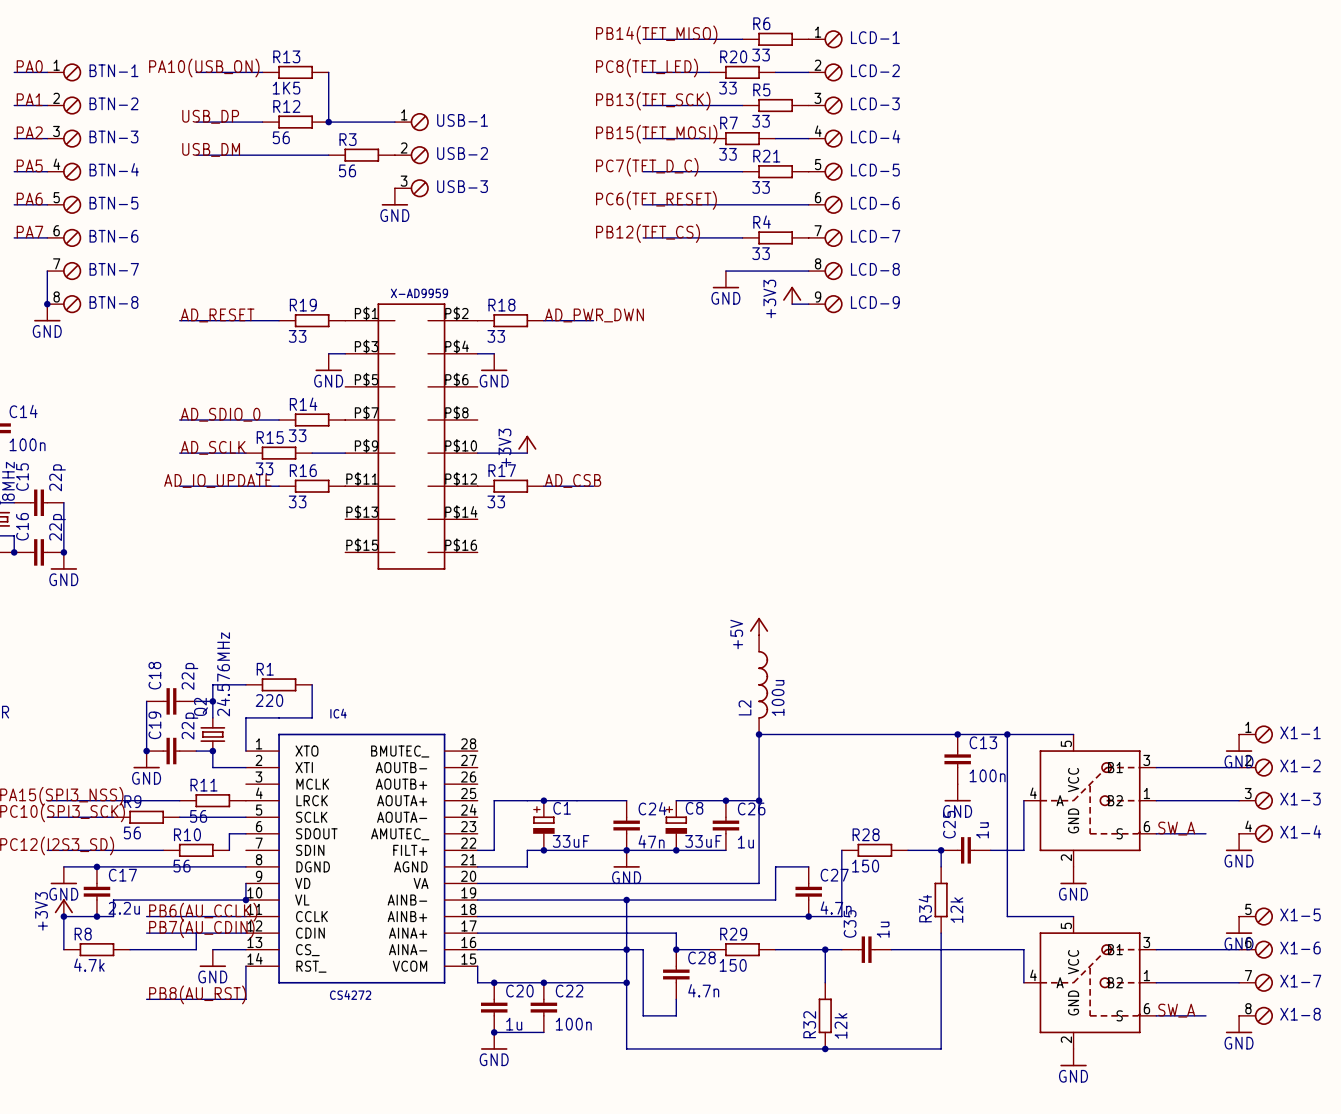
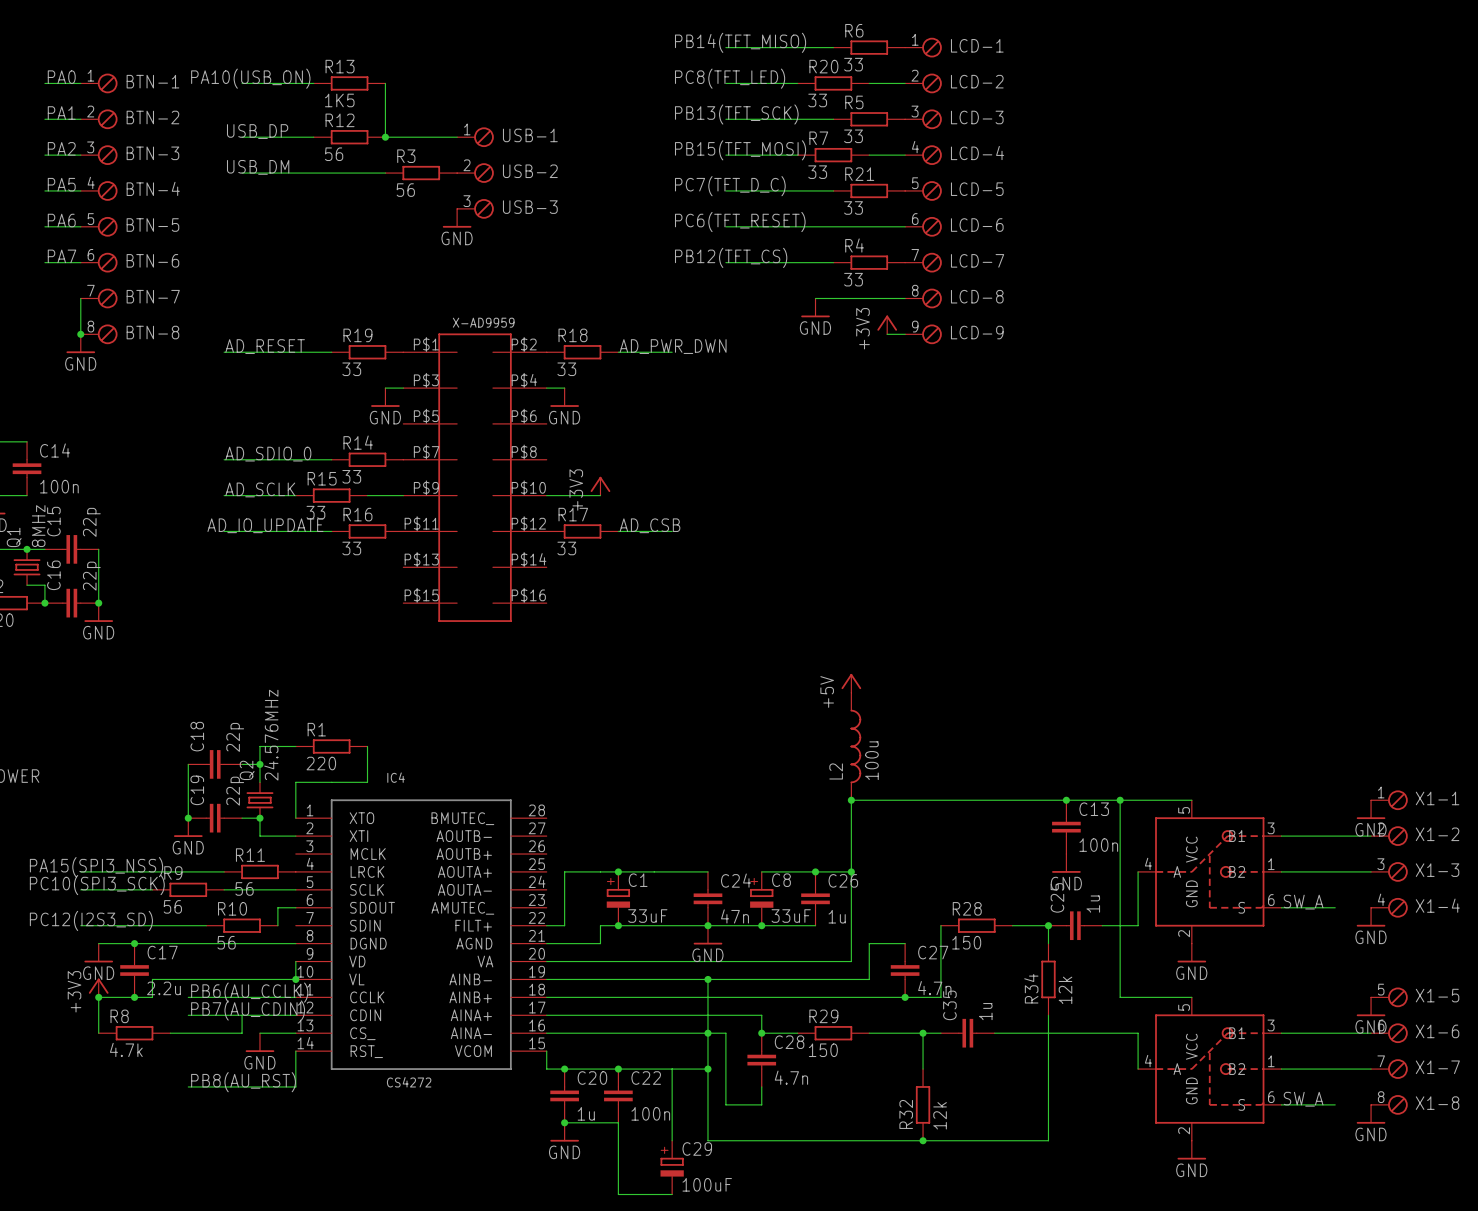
wire: none -> (672, 1069) (672, 1140)
wire: none -> (618, 1122) (618, 1194) (672, 1194)
C29: none -> 100uF (672, 1167)

